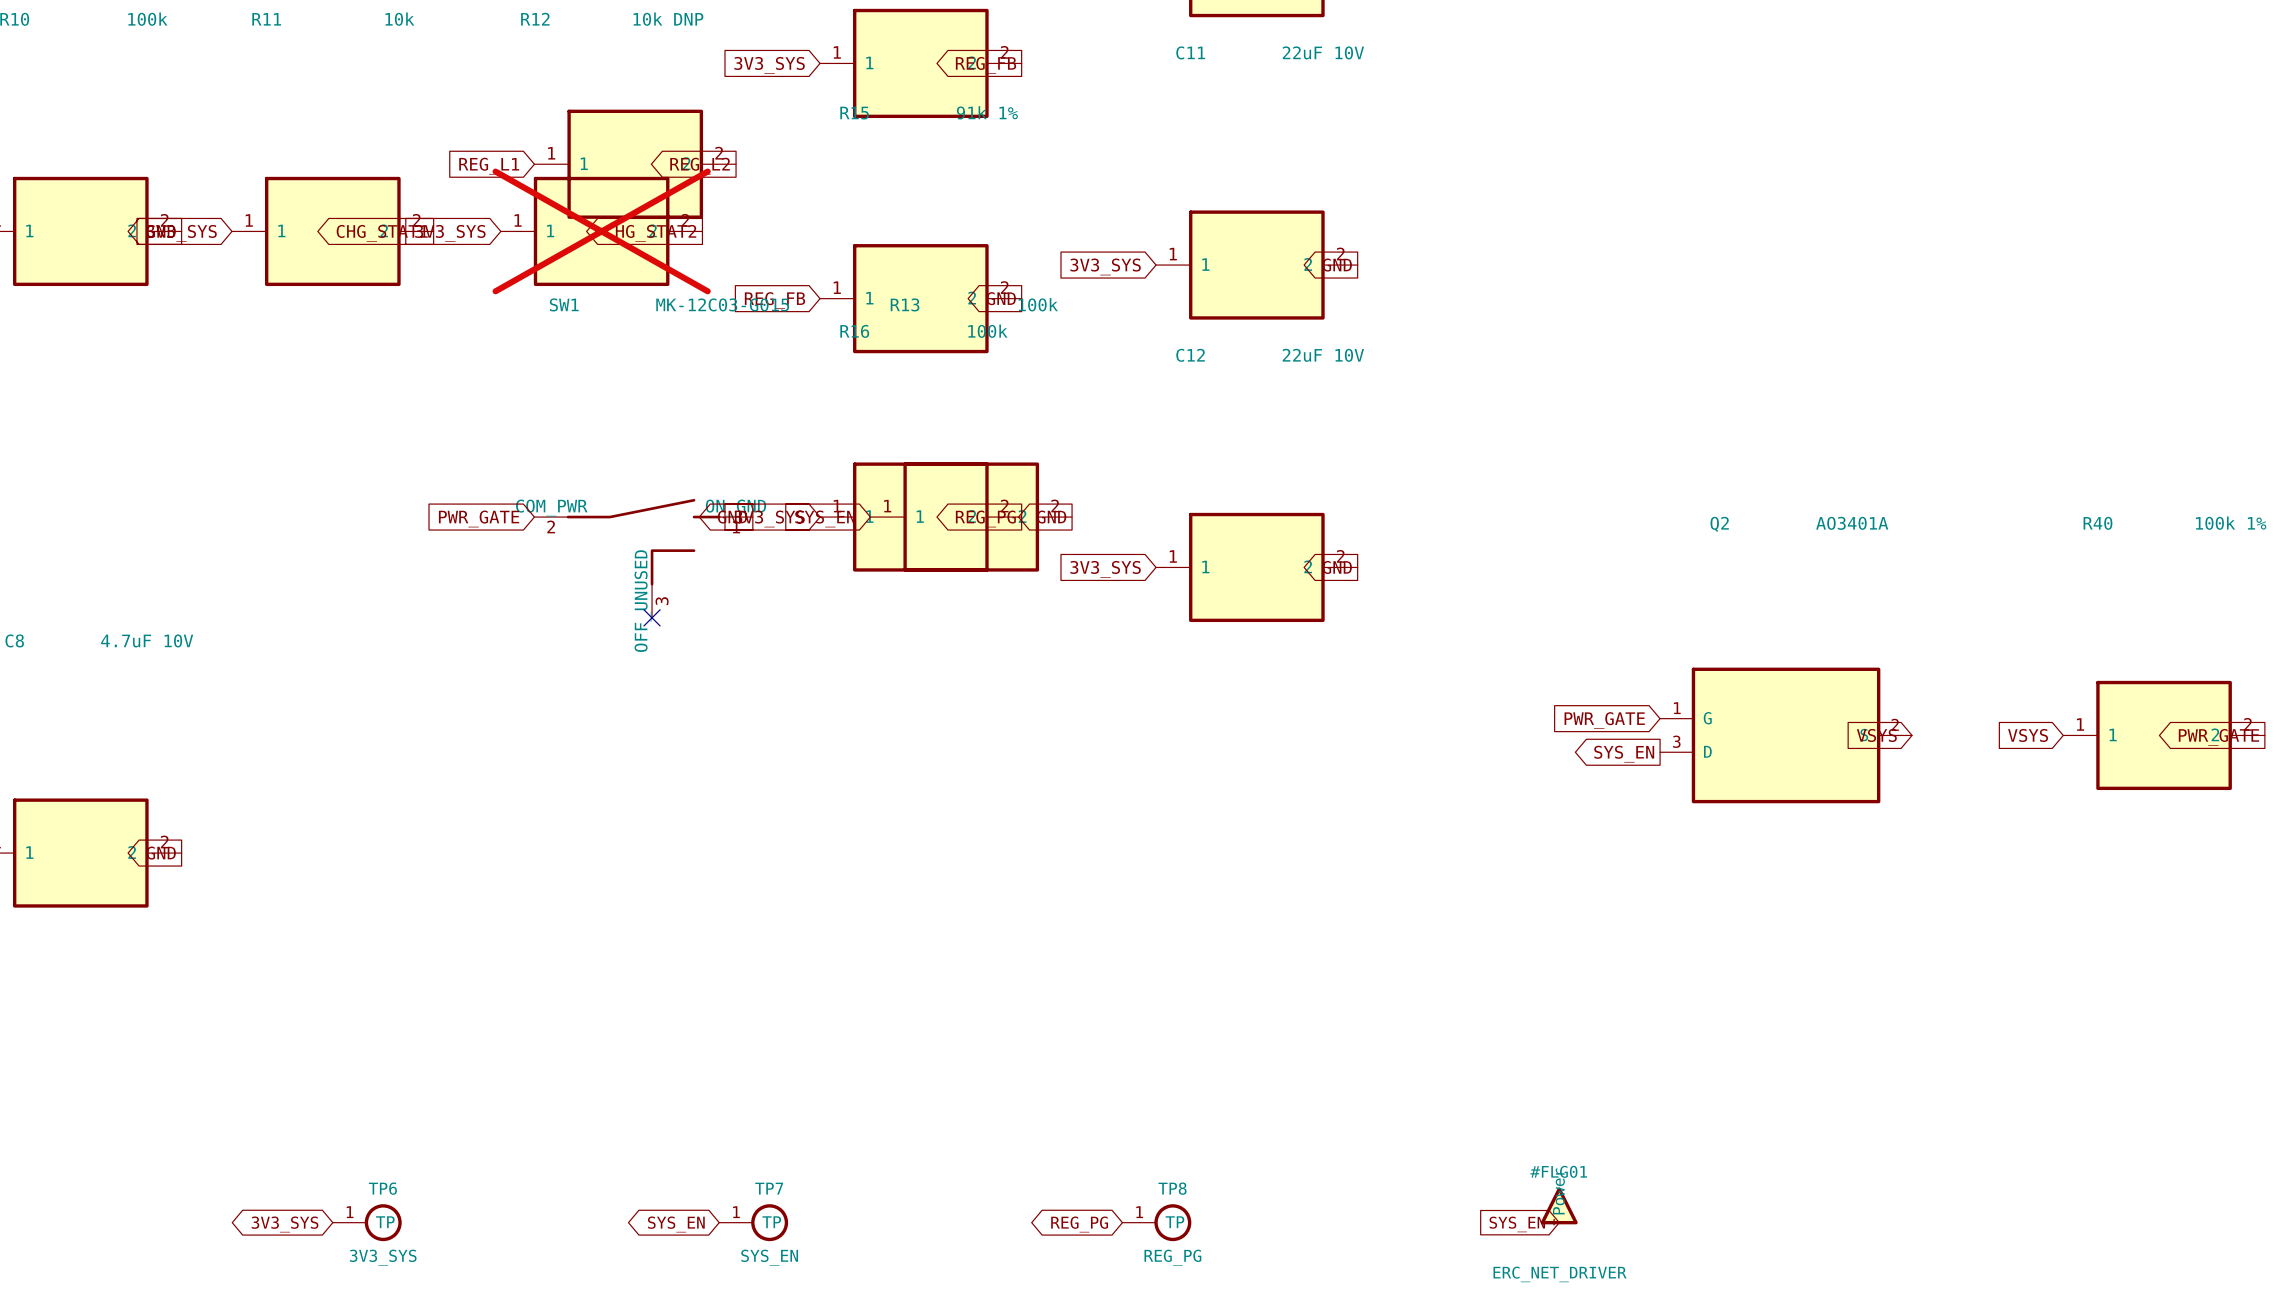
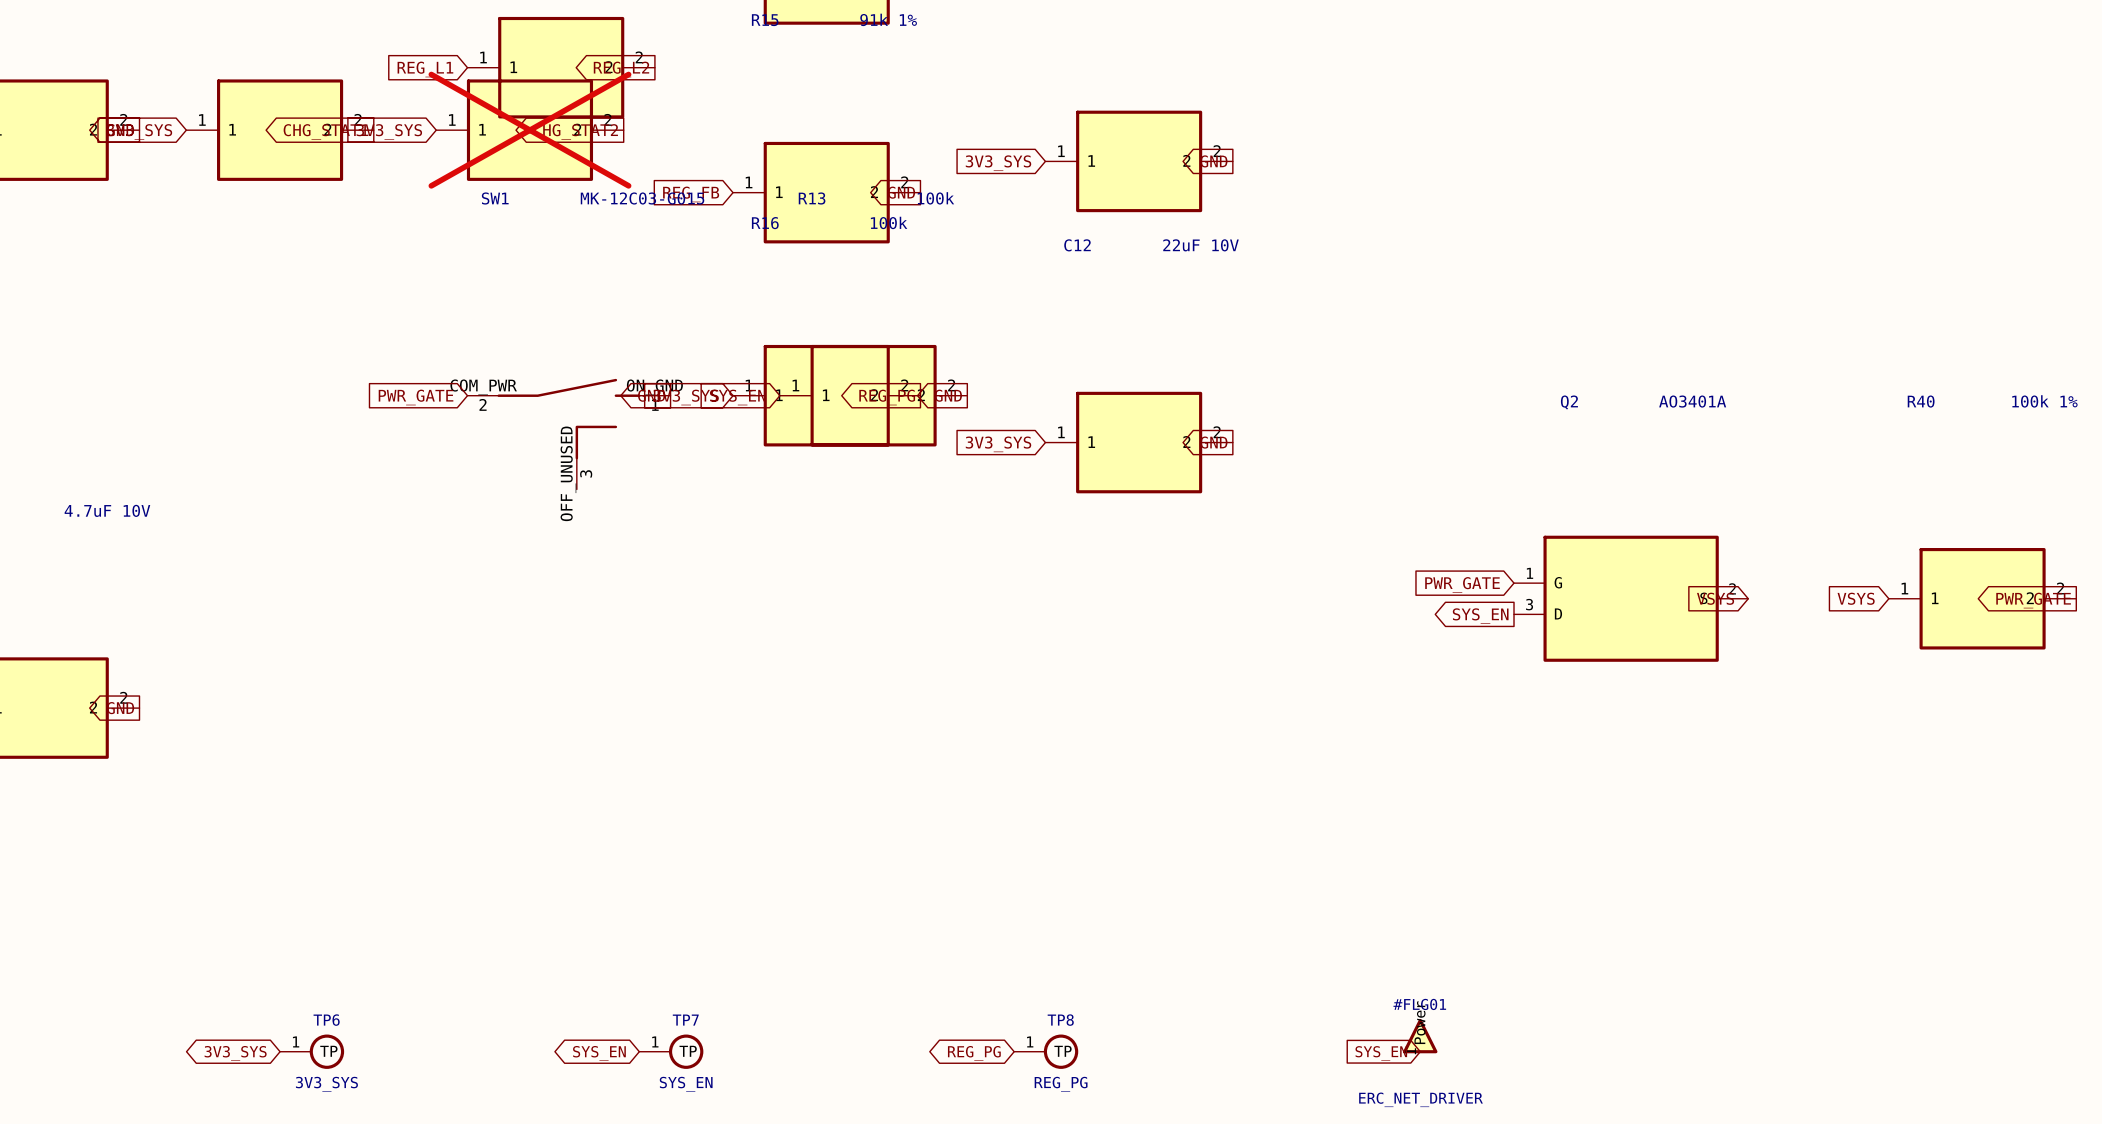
no-connect mark: (652, 617) -> none

